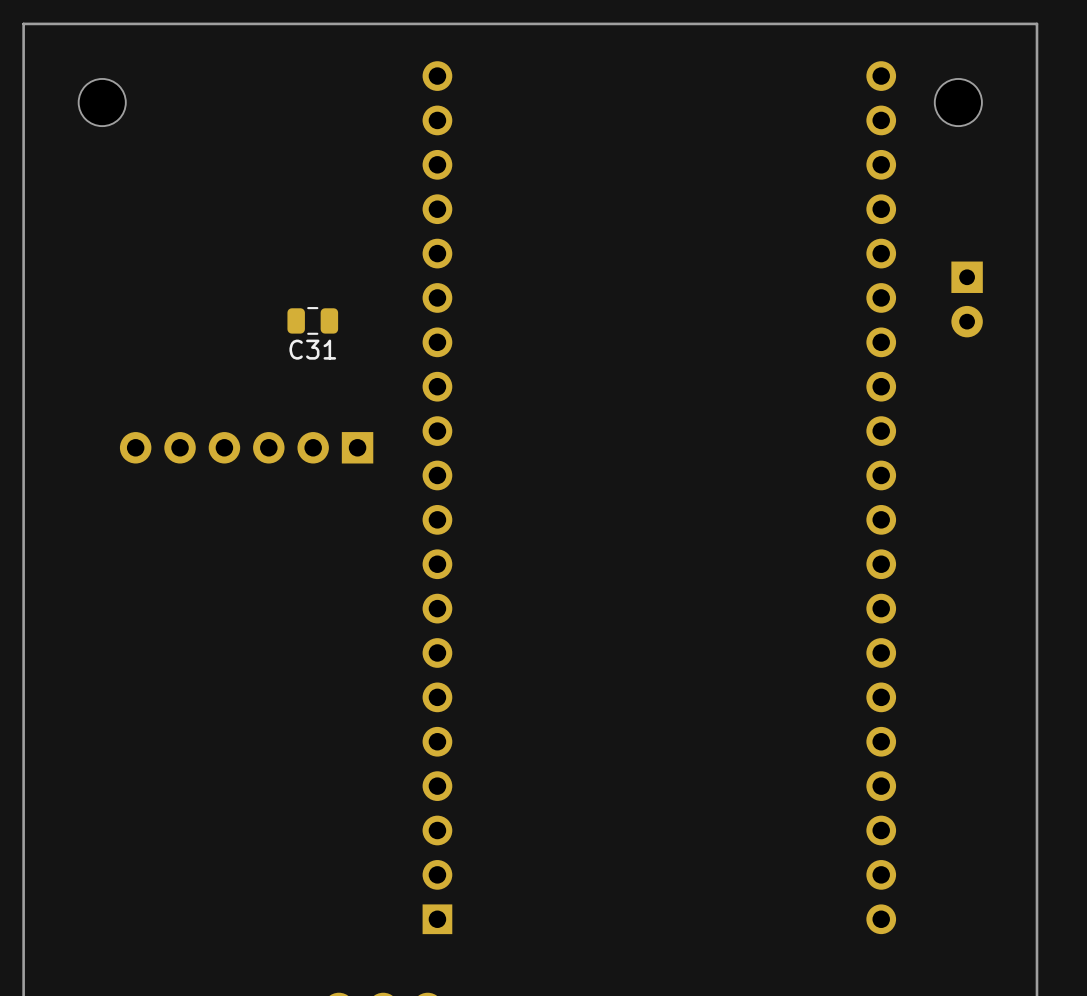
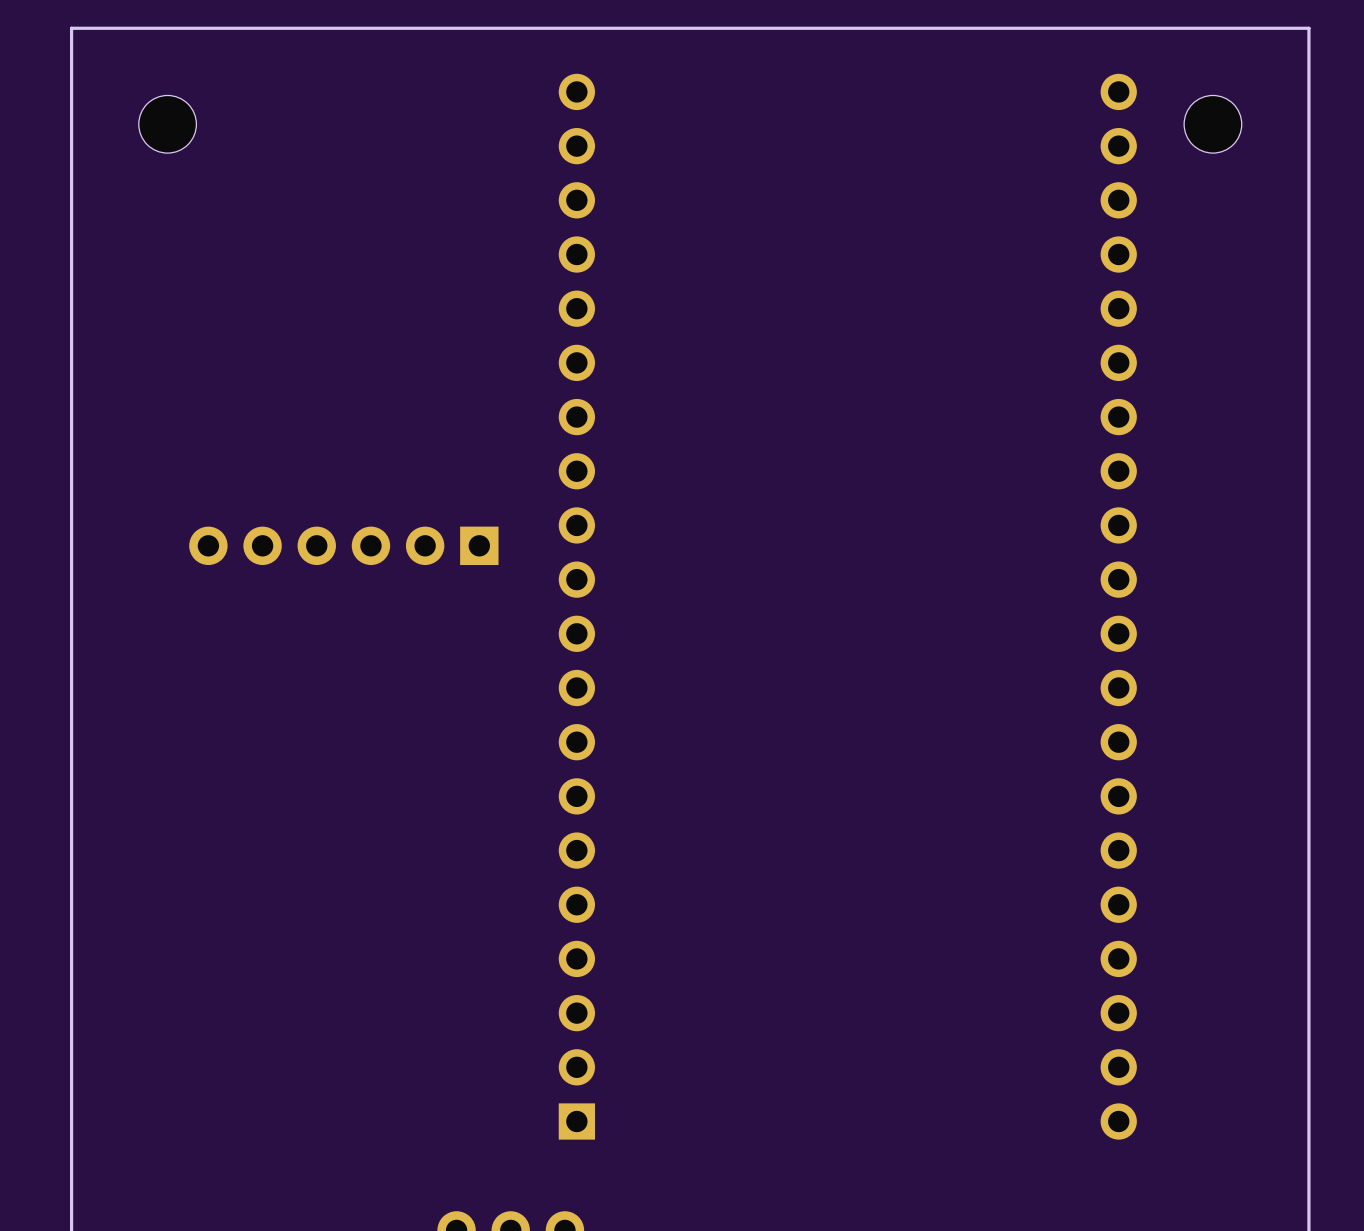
part: (967, 299) -> none
C31: (312, 320) -> none

